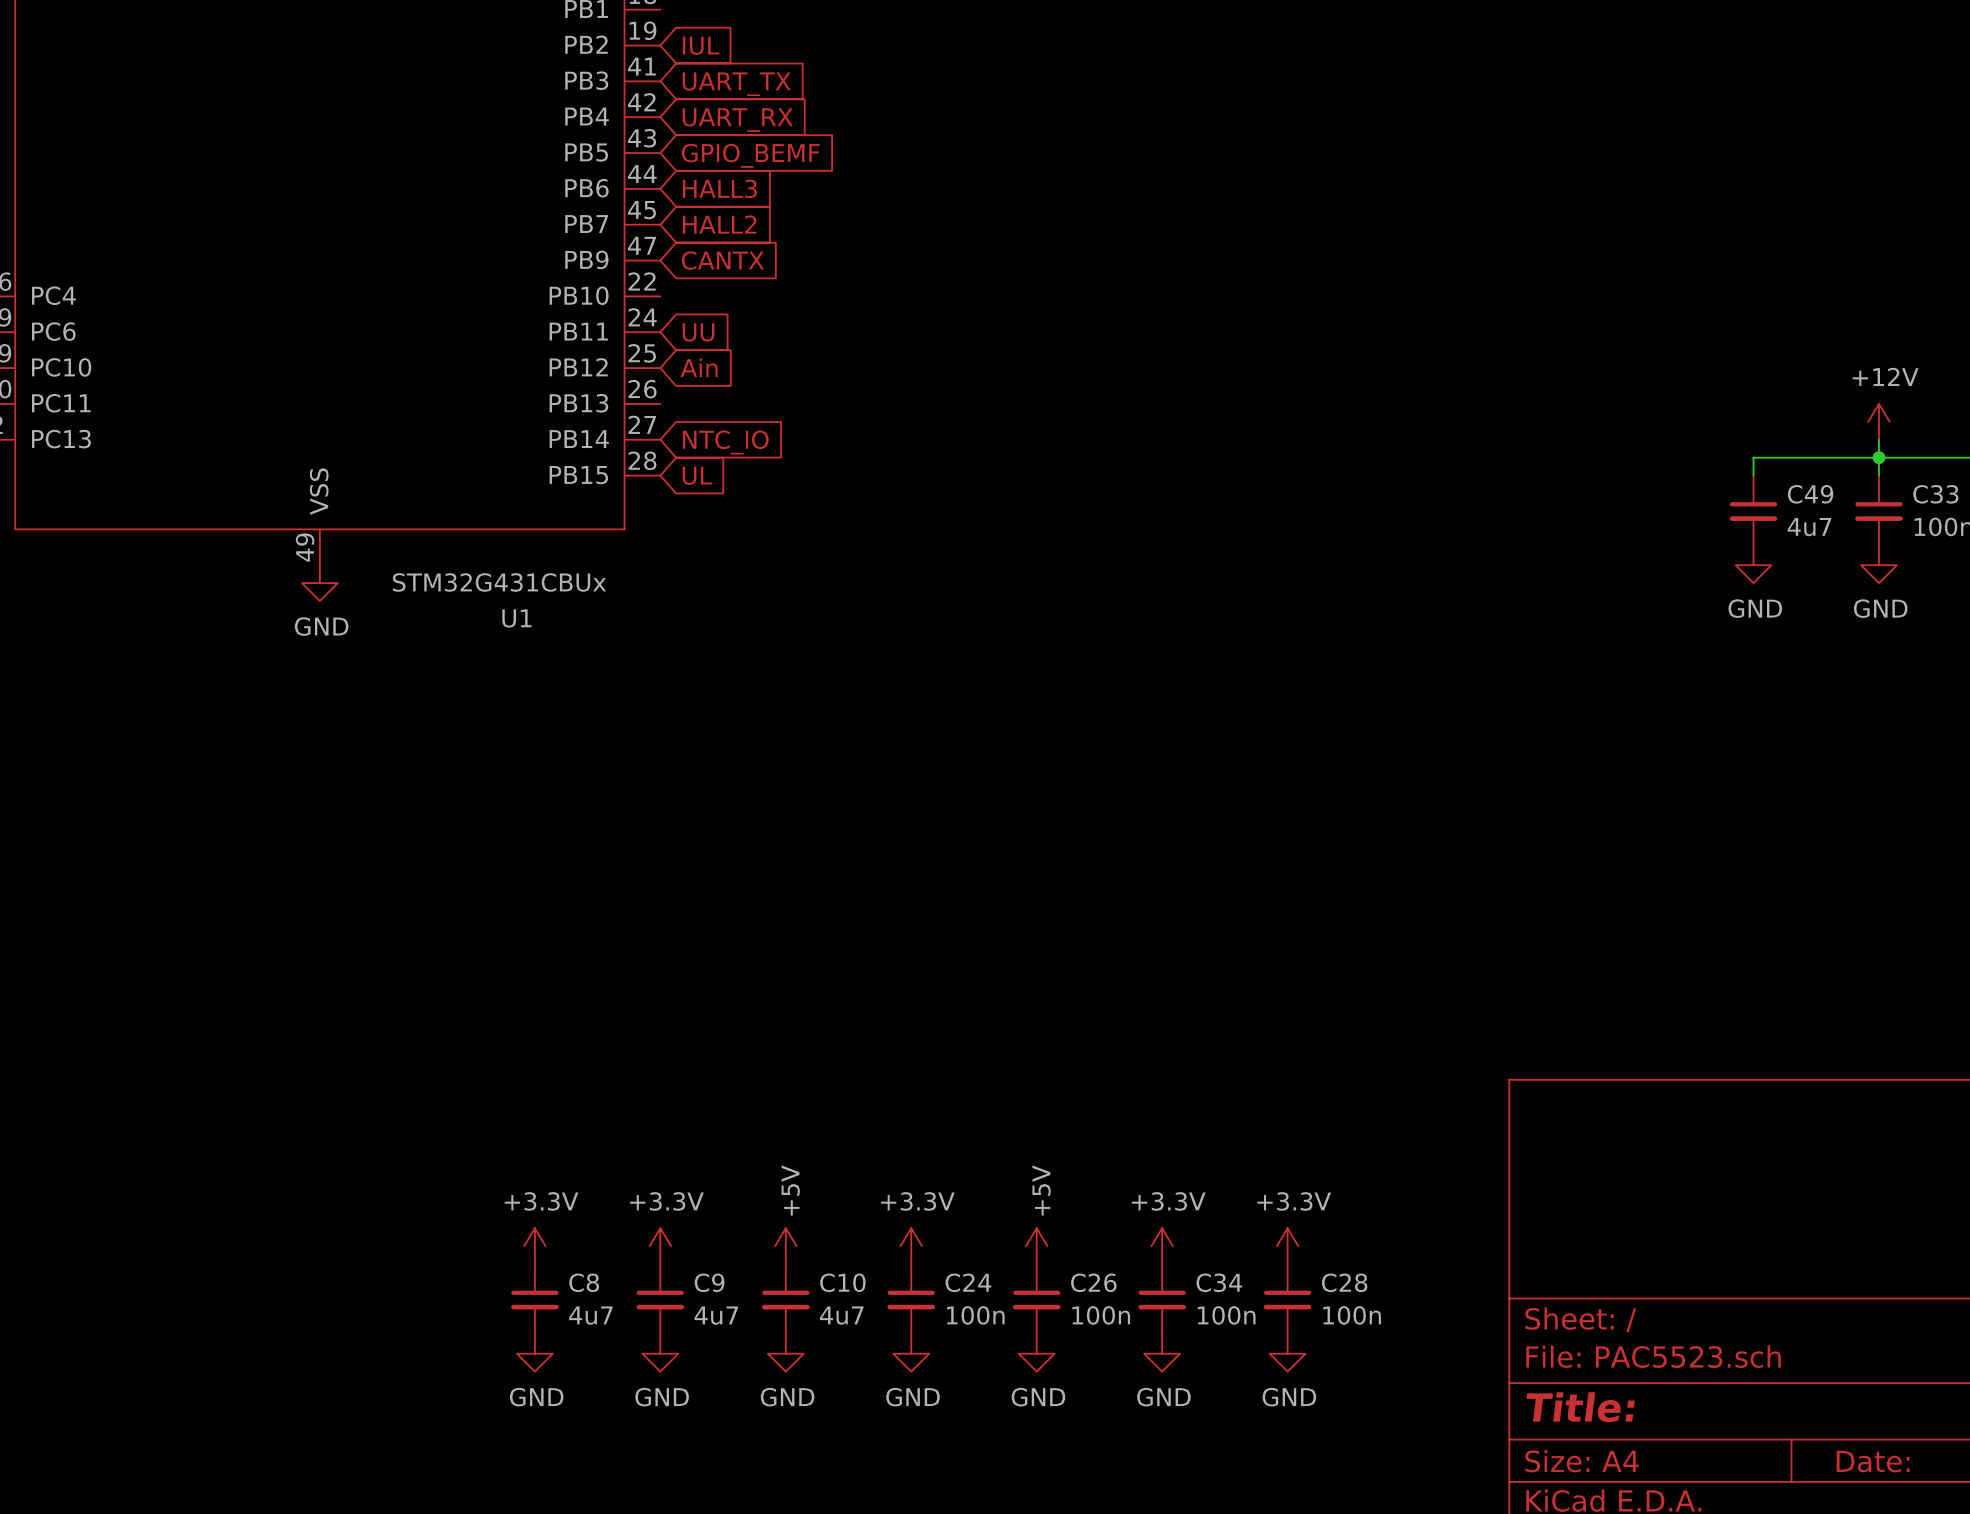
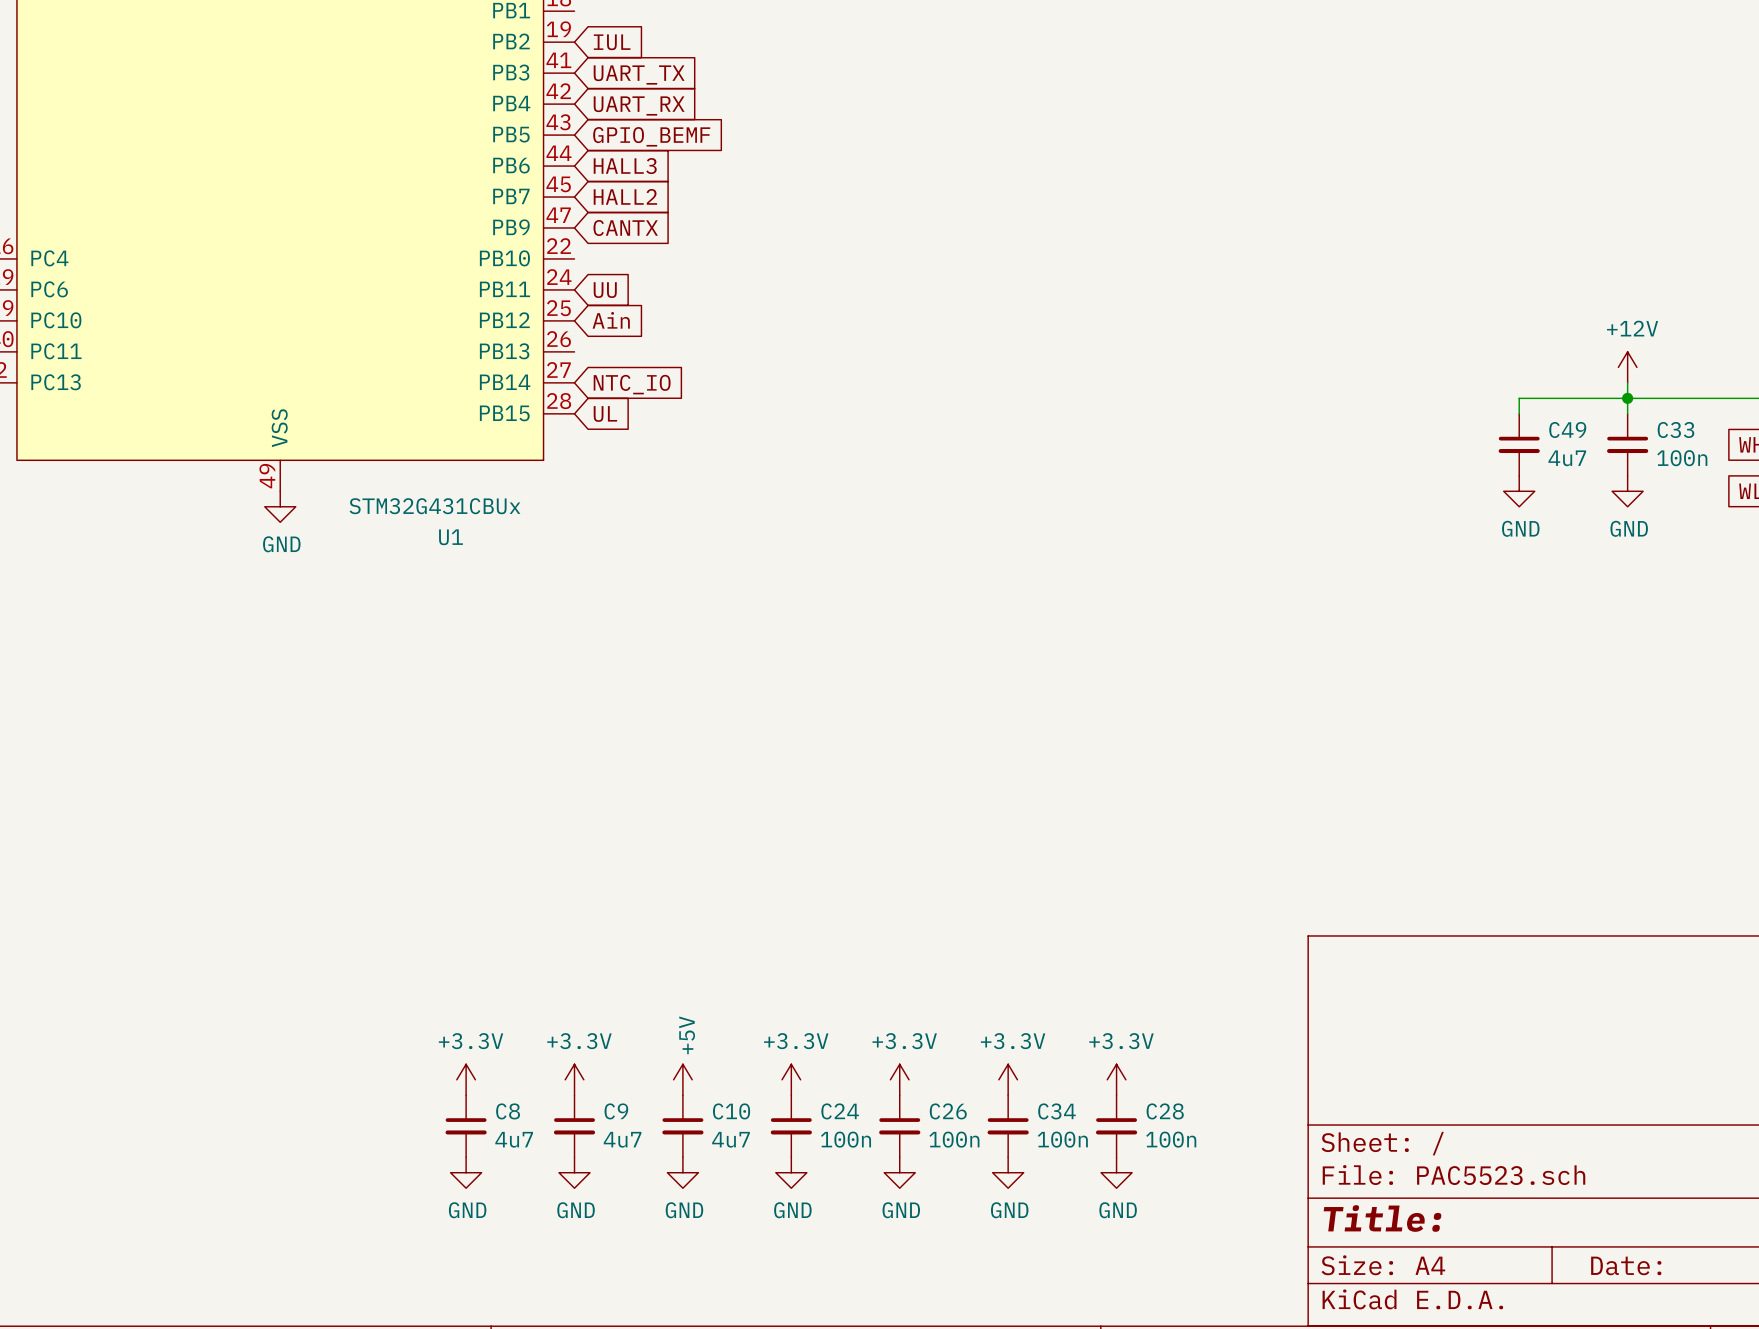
power symbol: +5V (1036, 1246) -> +3.3V (899, 1079)

